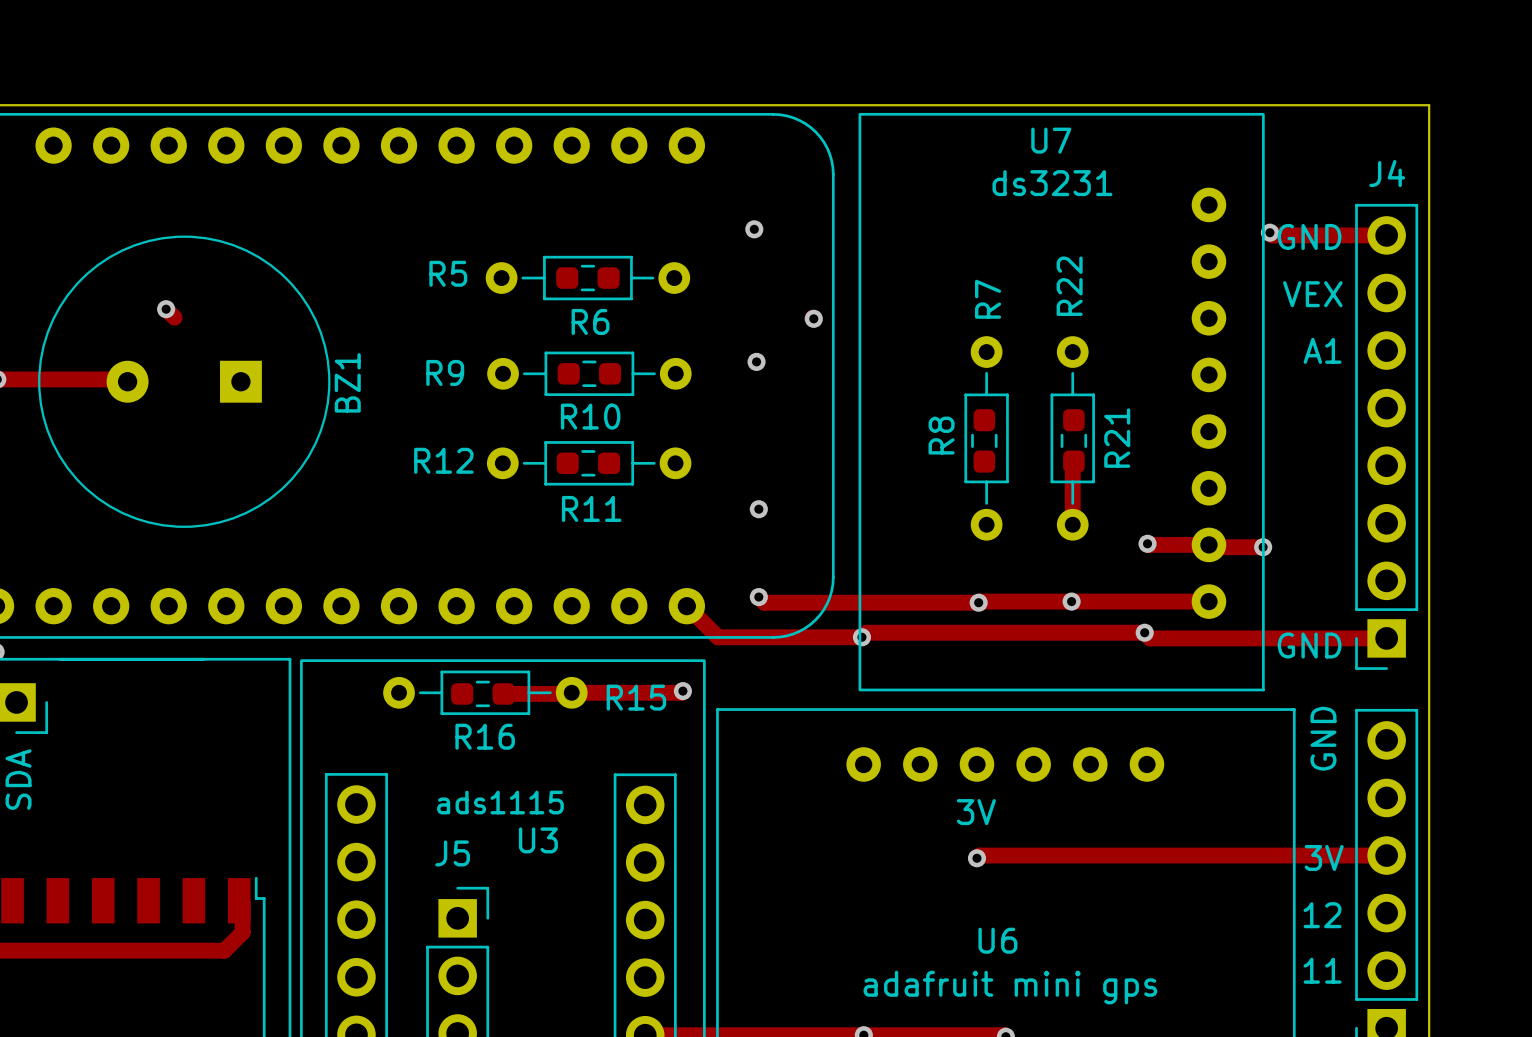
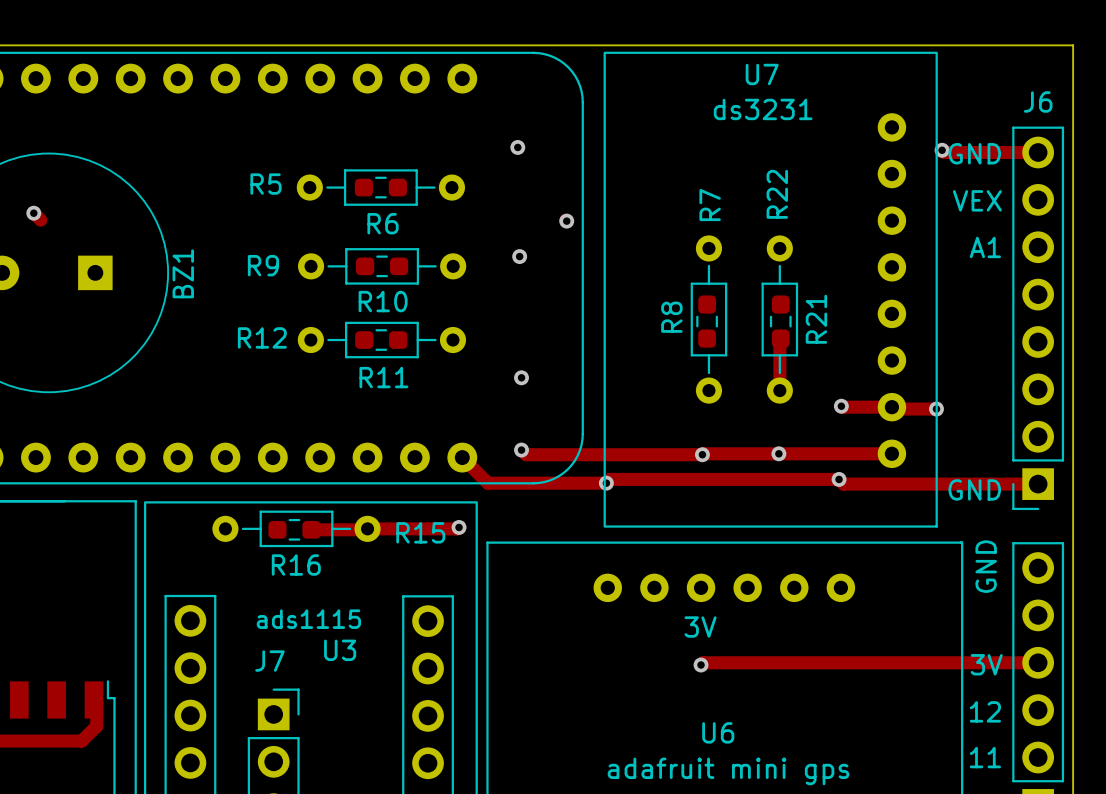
J4 name: J4 (1387, 173) -> J6 (1038, 102)
J5 name: J5 (452, 853) -> J7 (269, 661)

